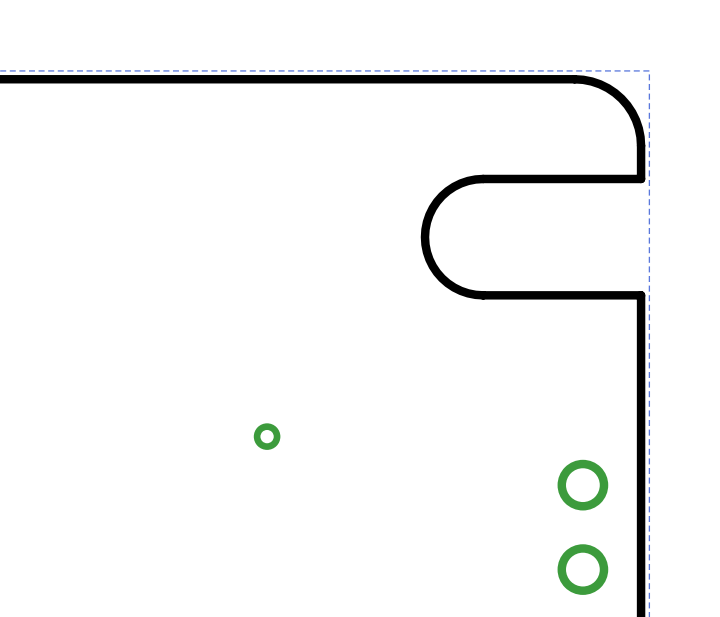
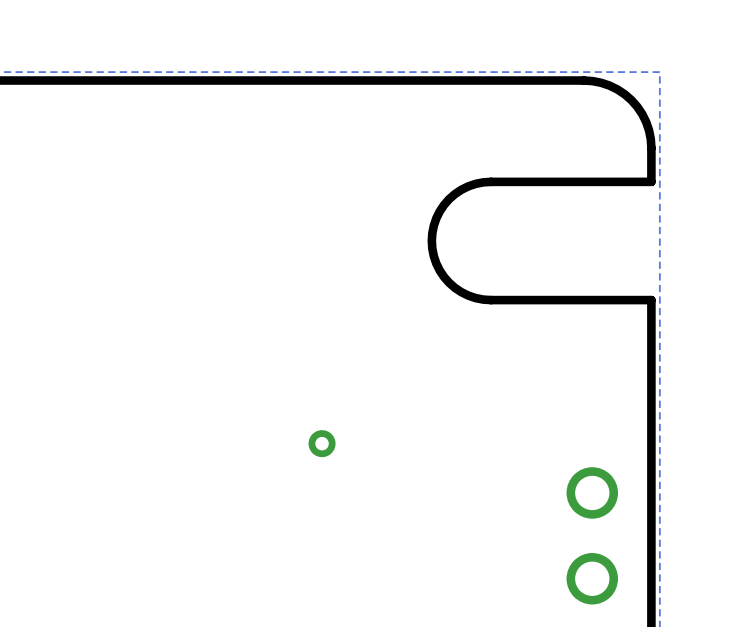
via position: (267, 436) -> (322, 443)

